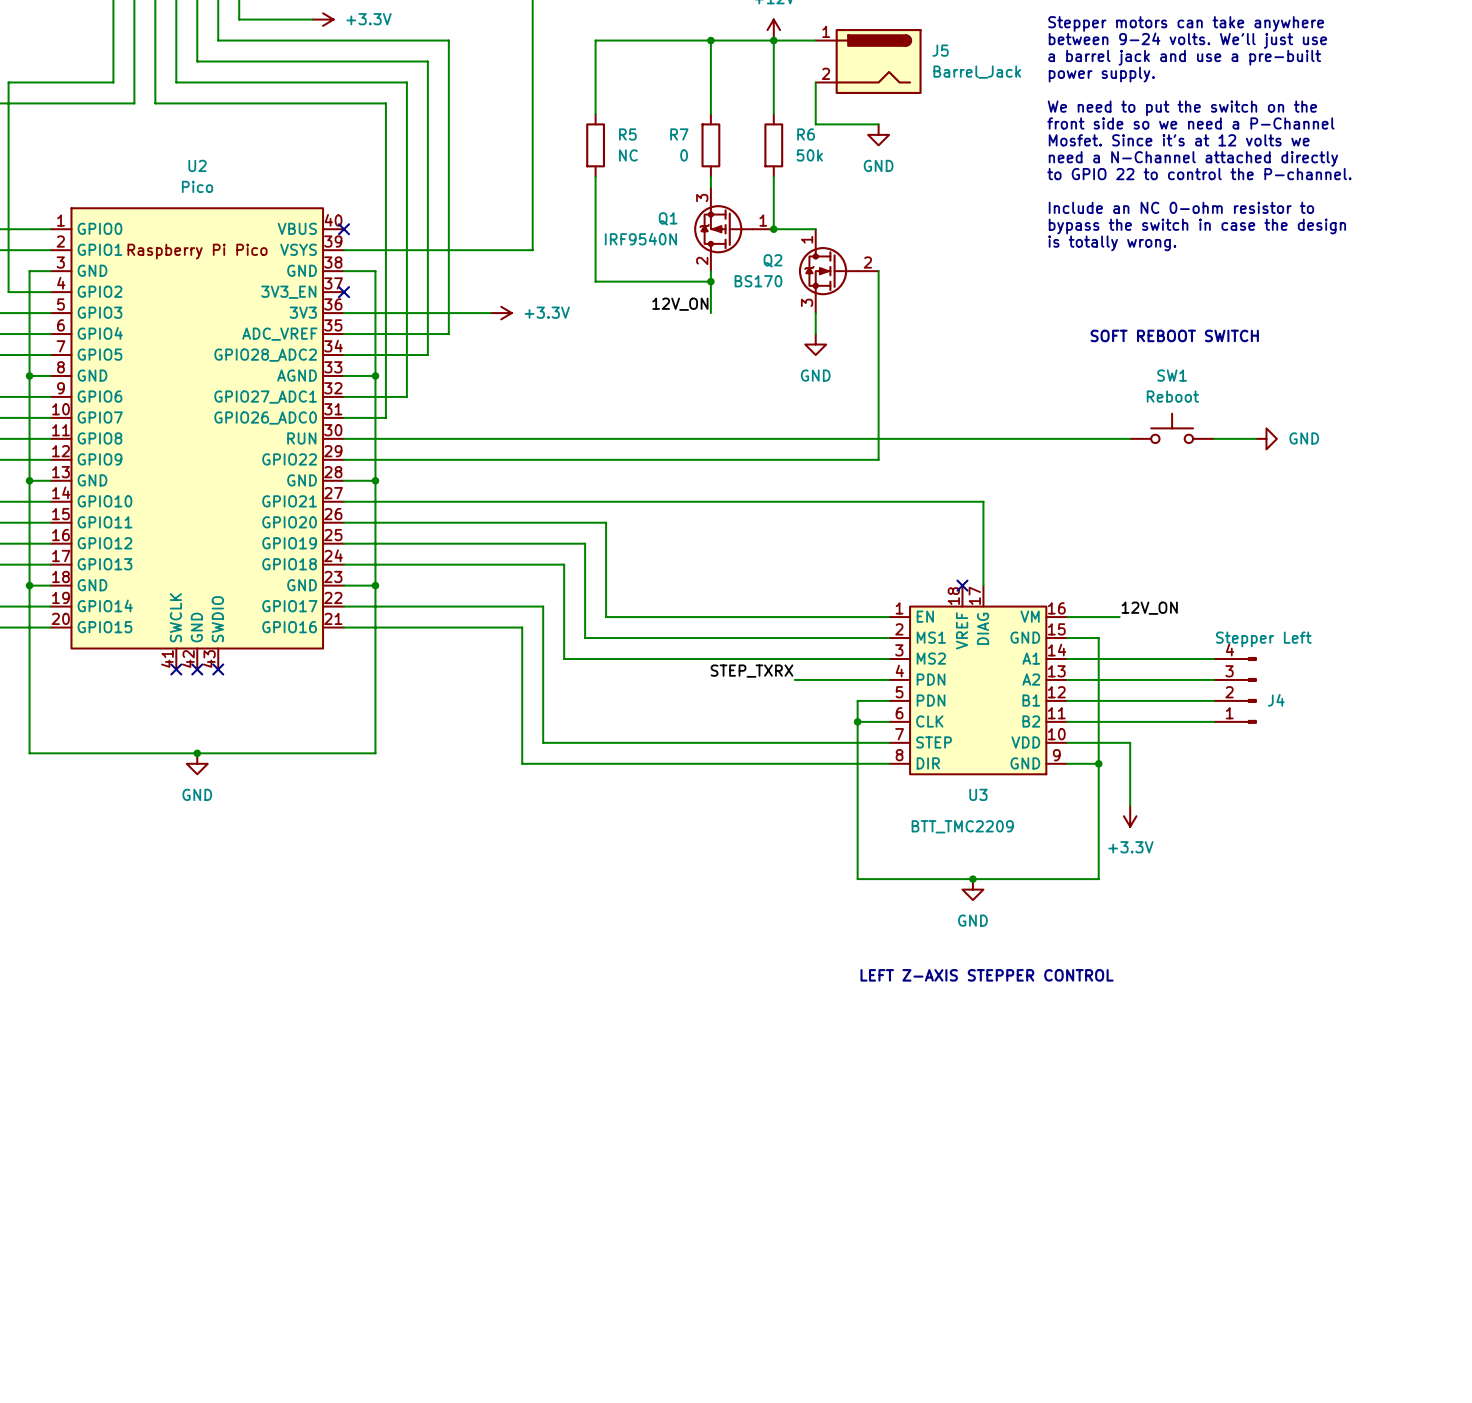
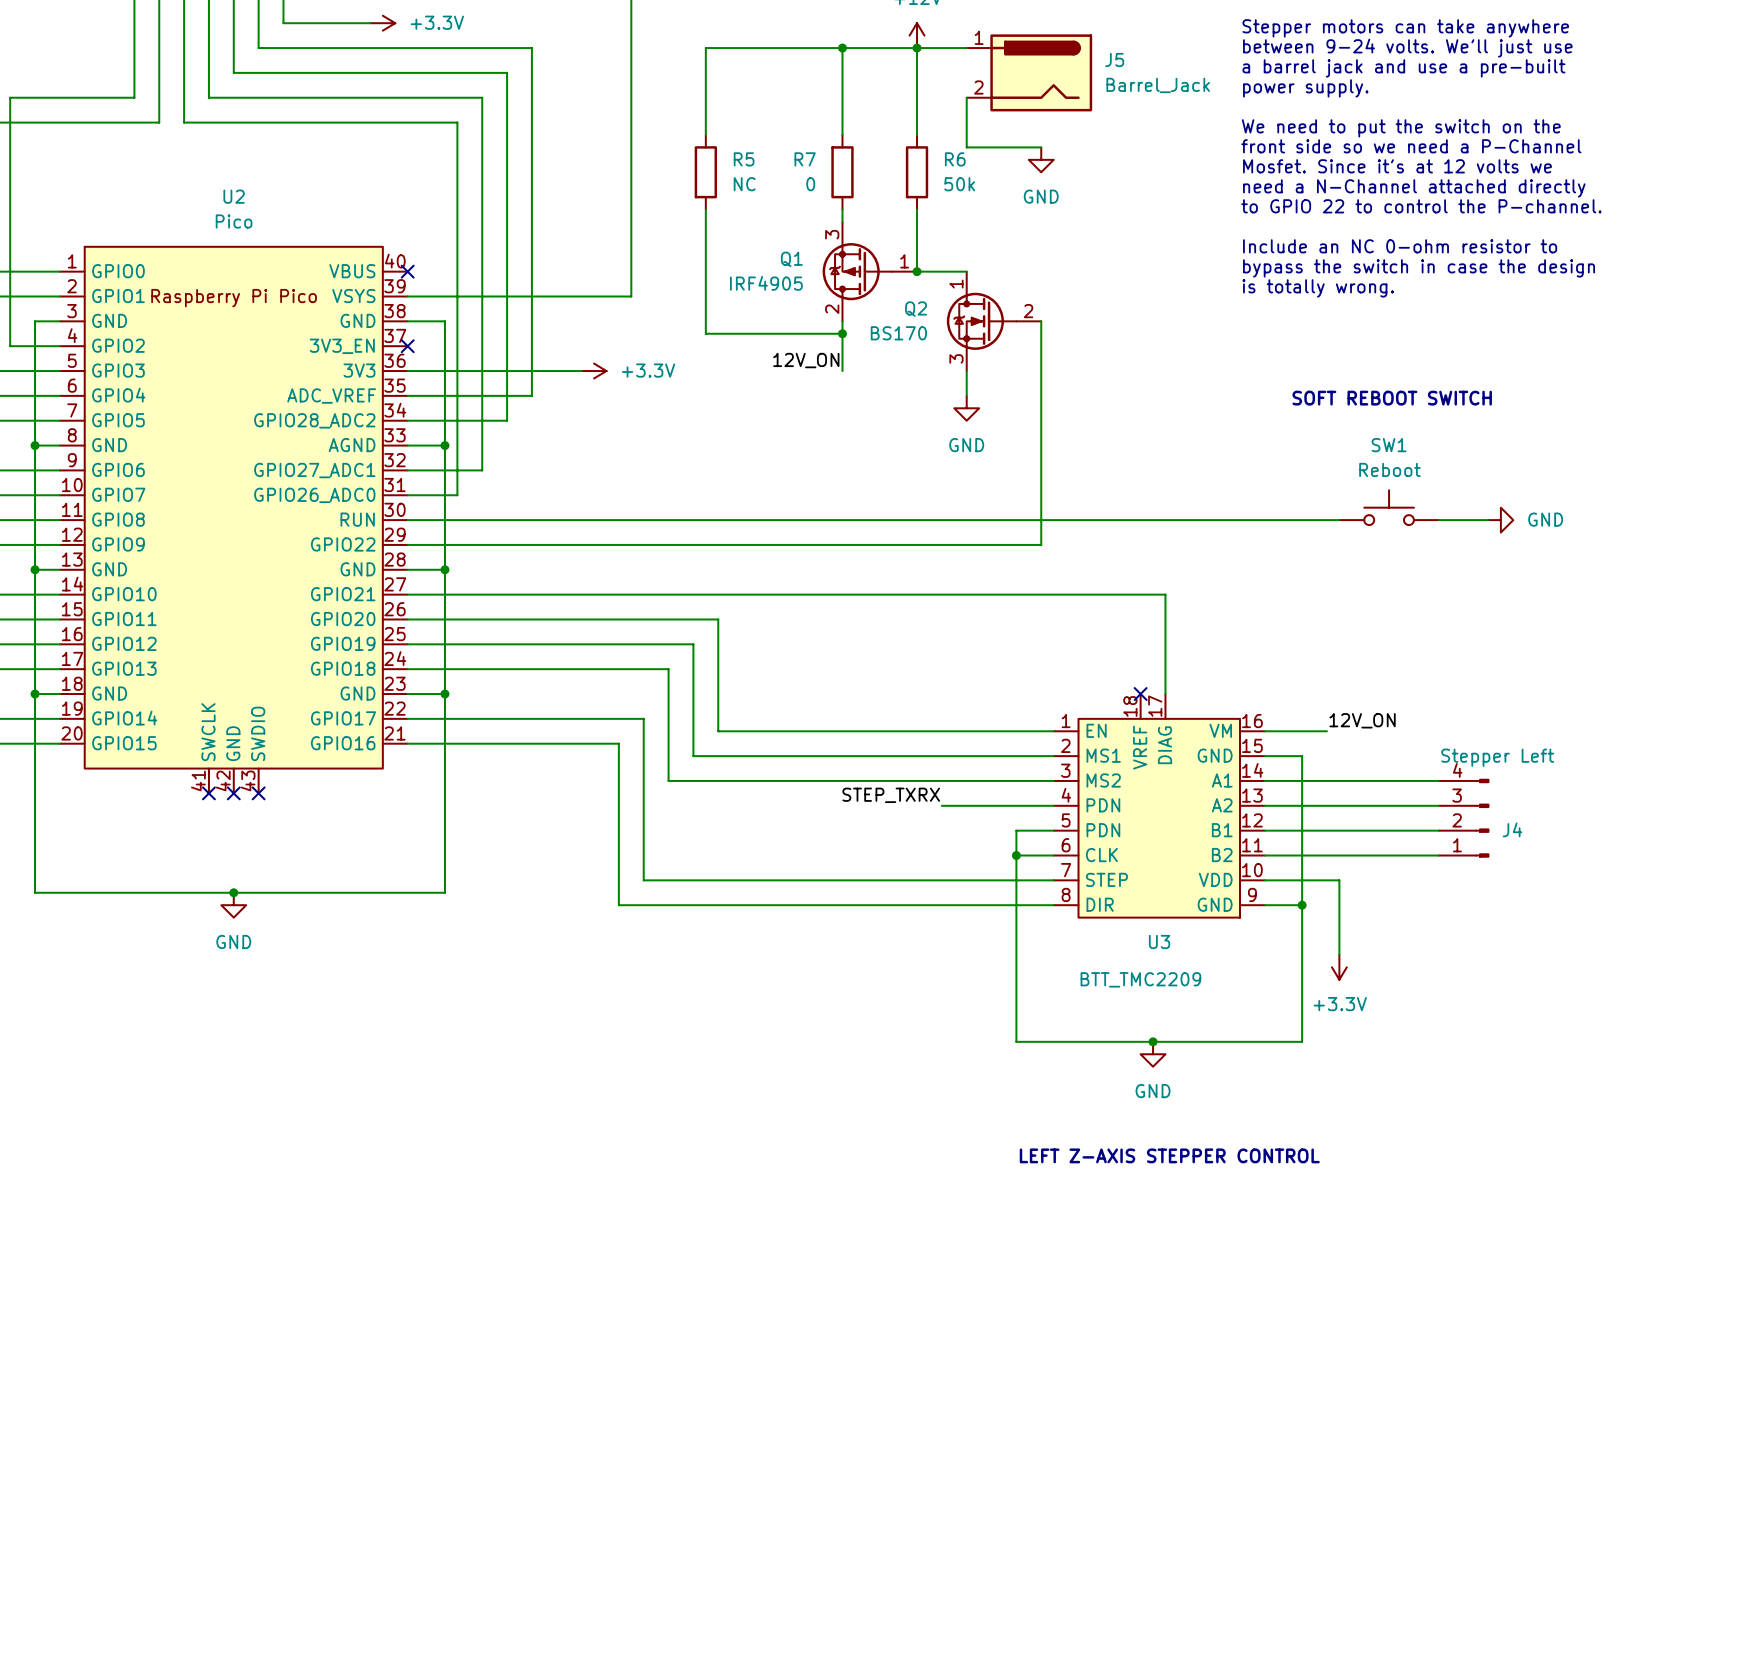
Q1 value: IRF9540N (640, 239) -> IRF4905 (766, 283)

